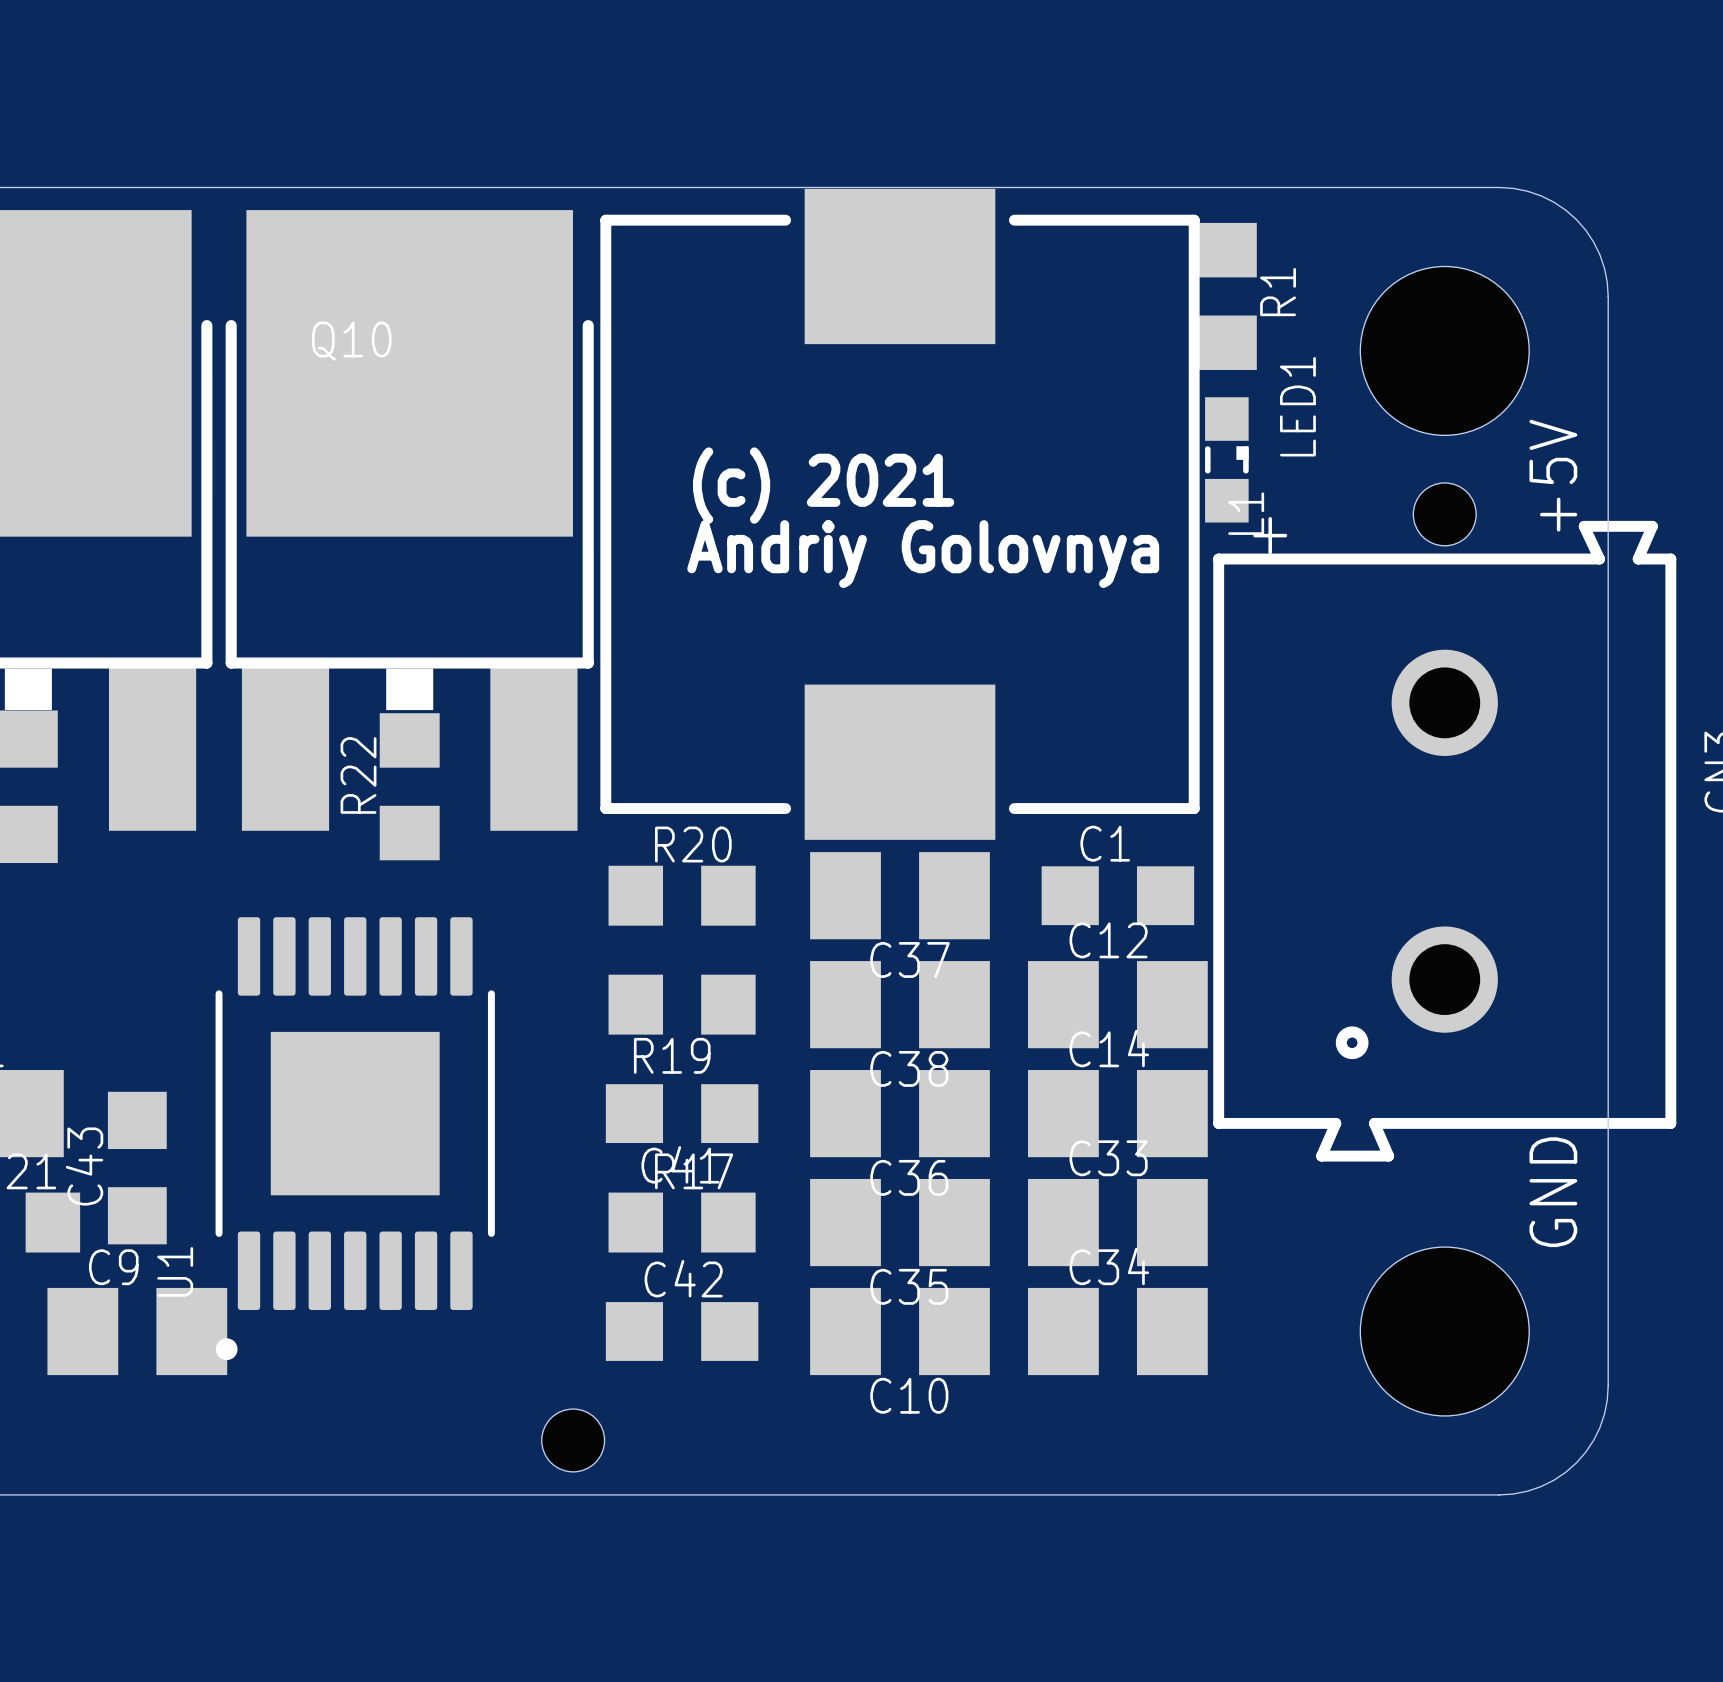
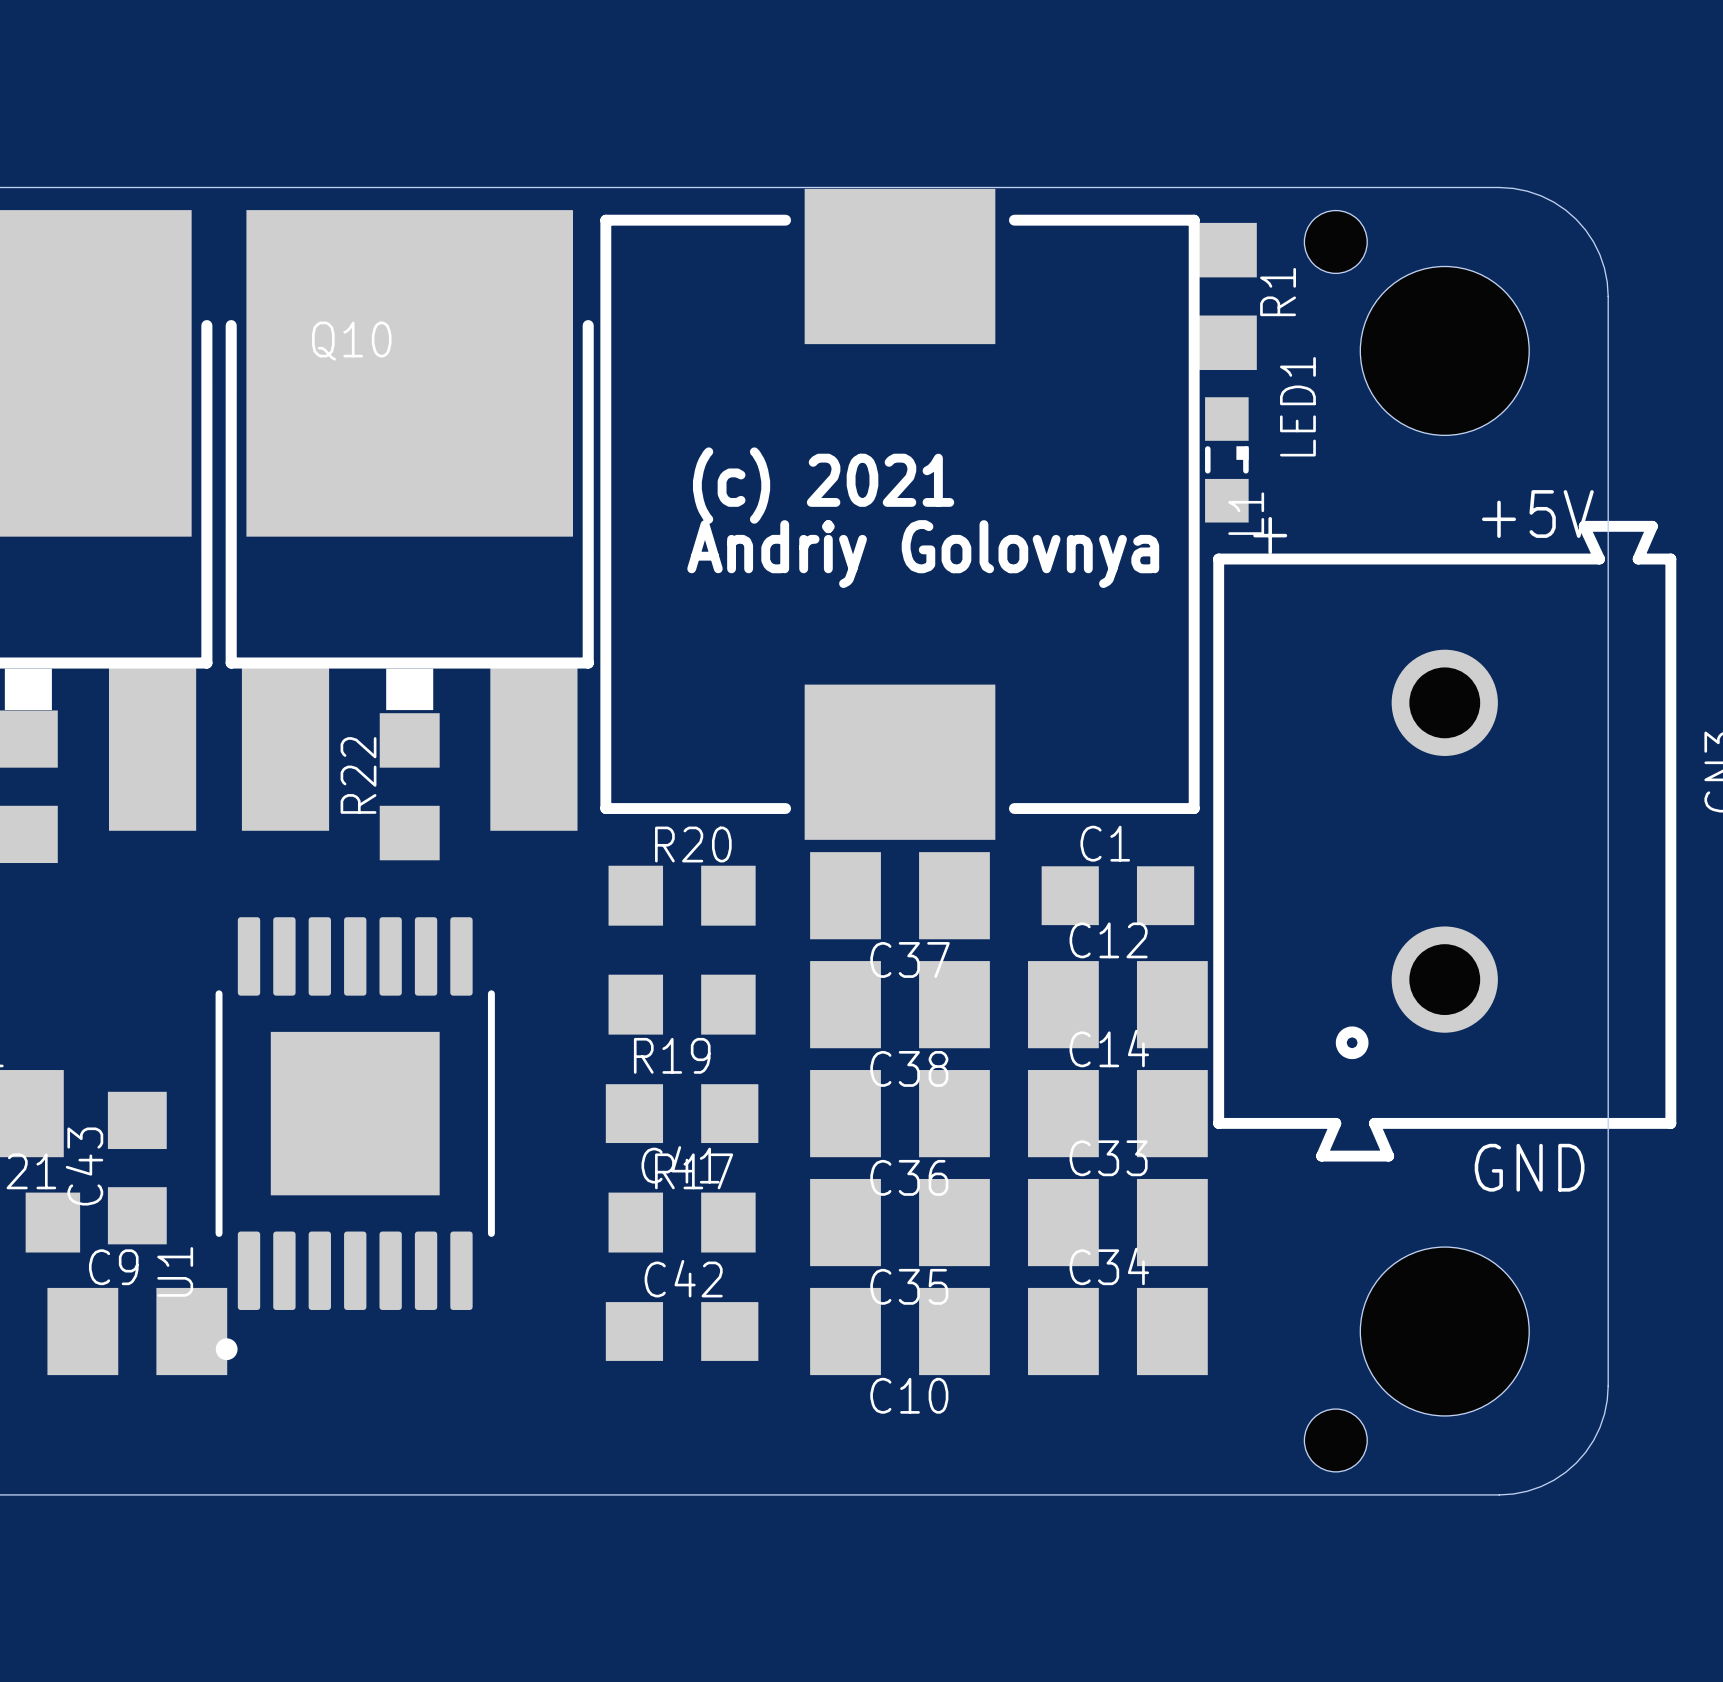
text rotation: 0° (1553, 475) -> 90° clockwise (1537, 514)
part position: (1444, 514) -> (1335, 241)
text rotation: 0° (1553, 1192) -> 90° clockwise (1529, 1167)
part: (573, 1440) -> none
part: none -> (1335, 1440)

